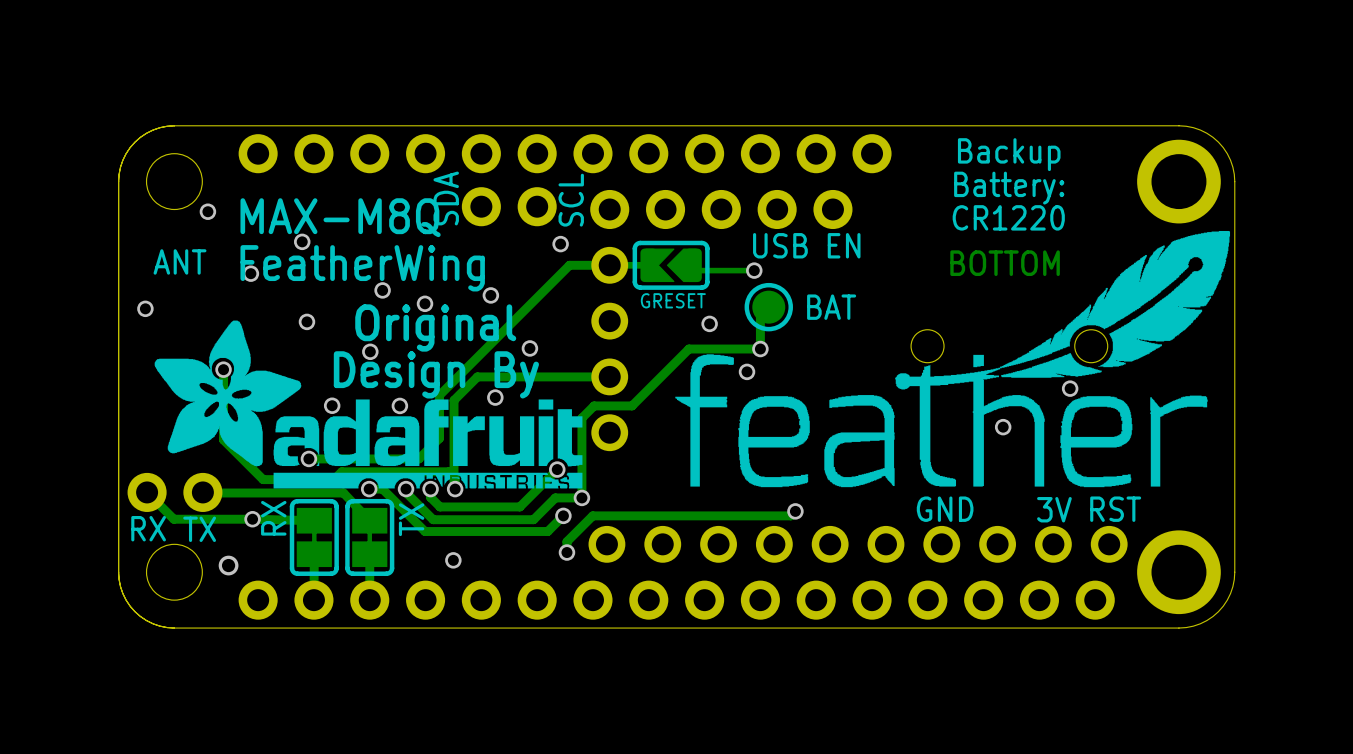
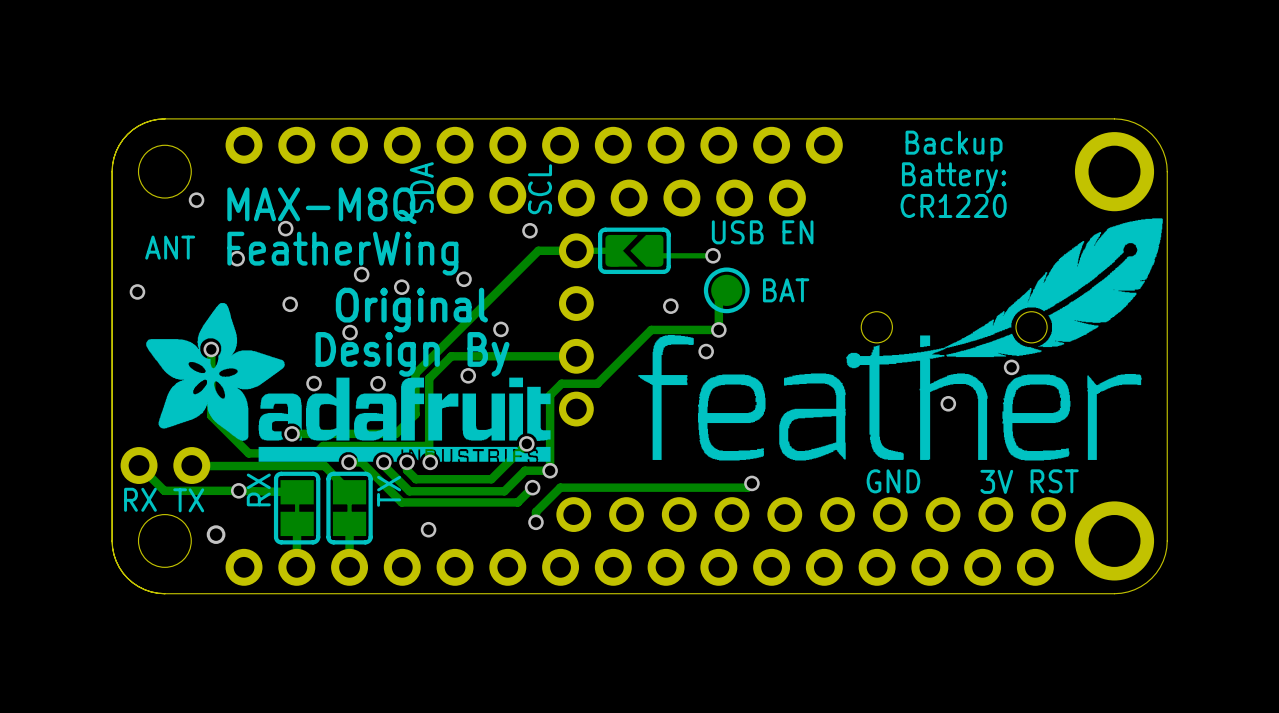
text: BOTTOM (1005, 263) -> none
text: GRESET (673, 300) -> none

